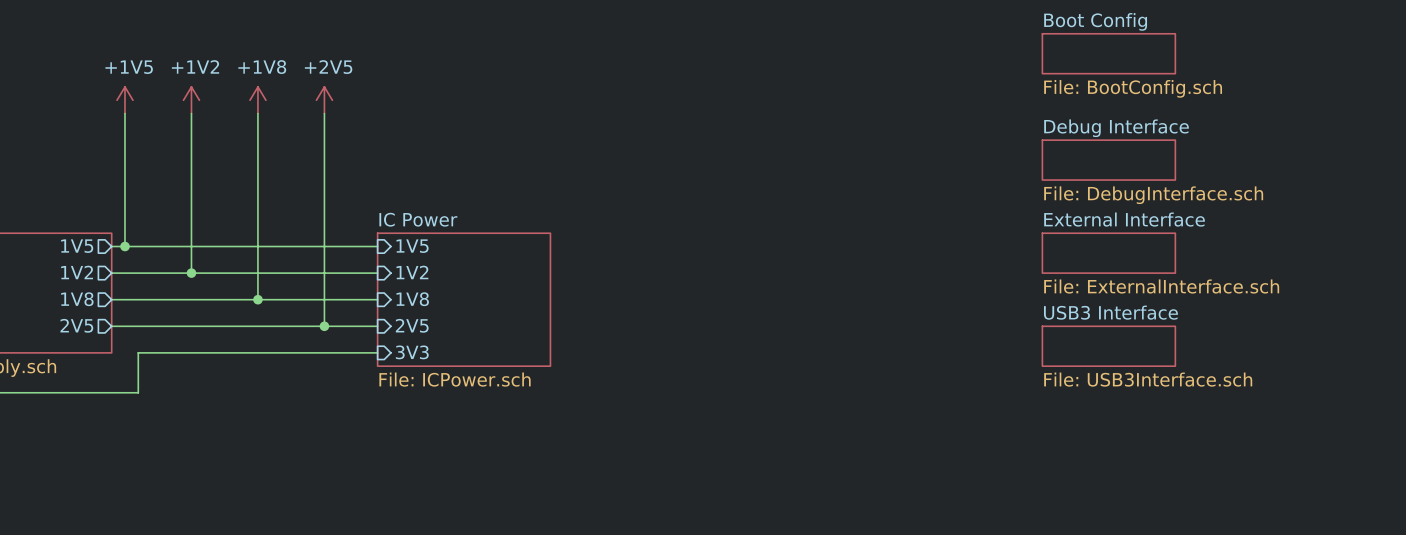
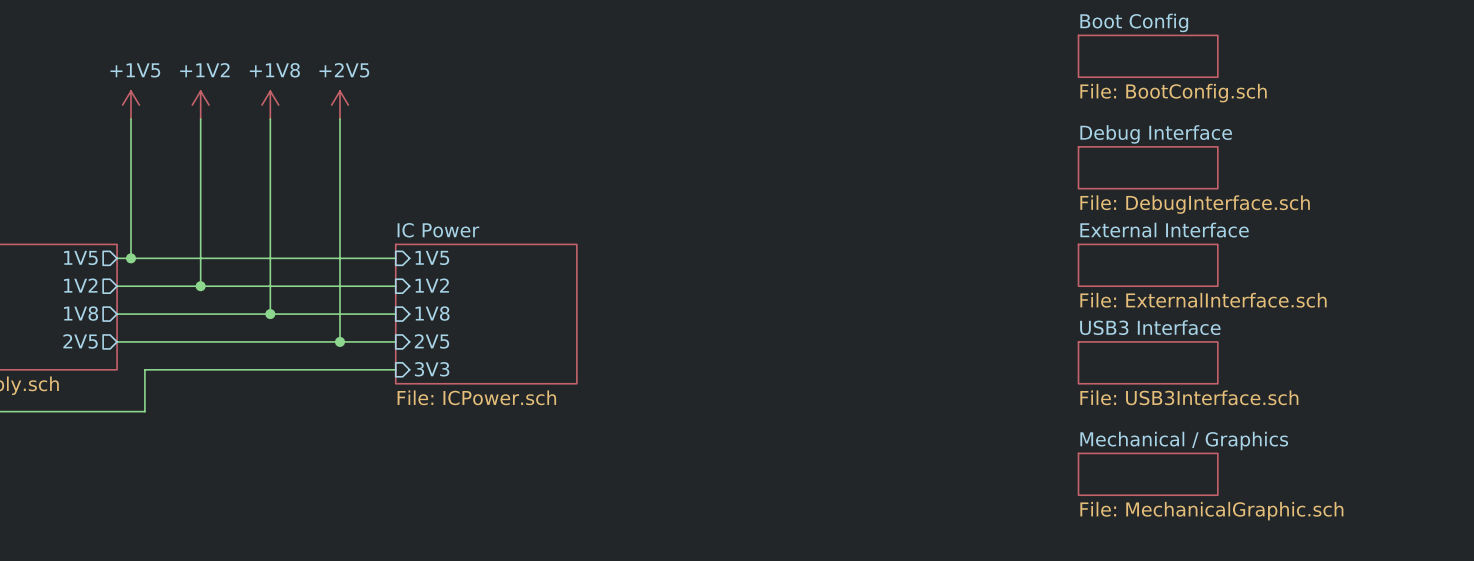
sheet Boot Config position: (1108, 53) -> (1148, 56)
sheet Debug Interface position: (1108, 160) -> (1148, 167)
sheet External Interface position: (1108, 253) -> (1148, 265)
sheet USB3 Interface position: (1108, 346) -> (1148, 362)
sheet Mechanical / Graphics: none -> File: MechanicalGraphic.sch (1148, 474)

